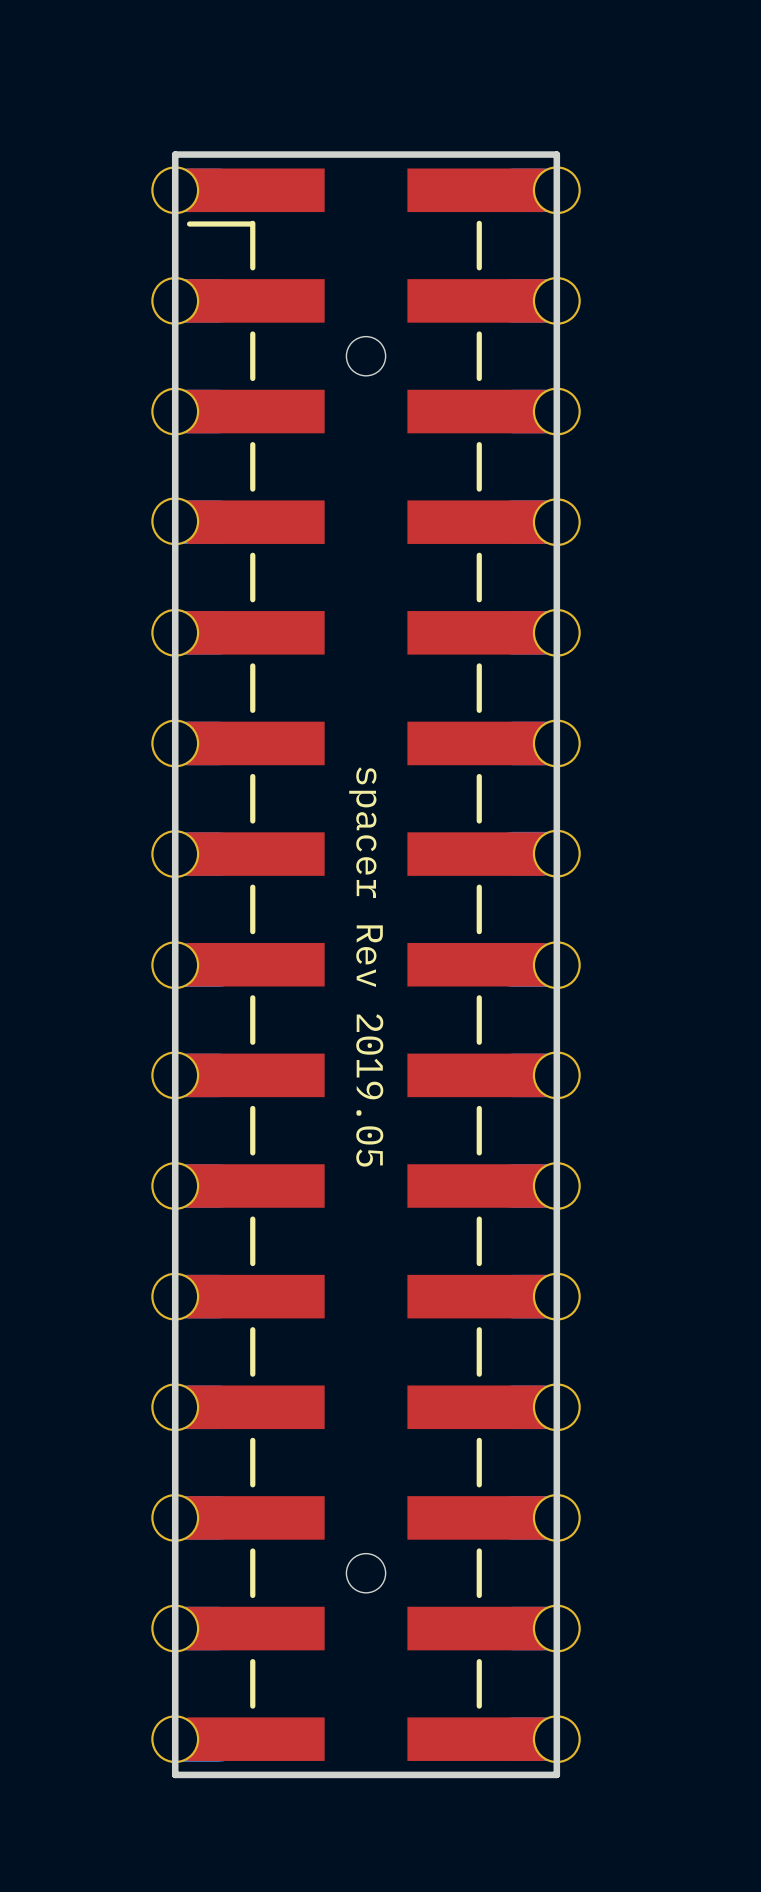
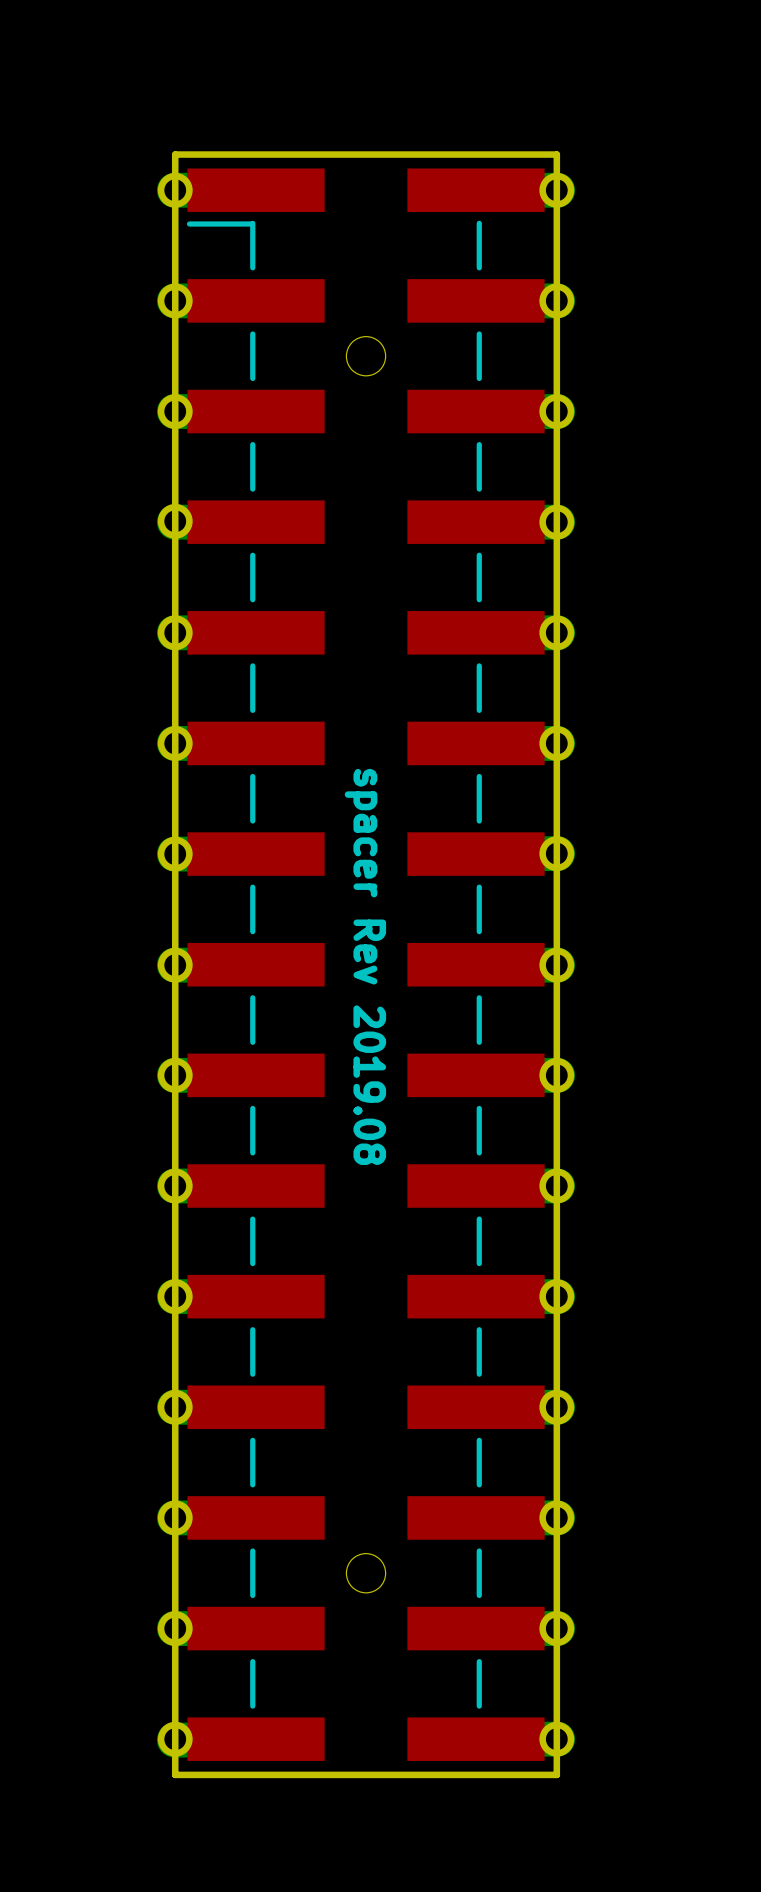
part footprint: [151, 151, 581, 1779] -> [156, 151, 576, 1779]
text: spacer Rev 2019.05 (366, 966) -> spacer Rev 2019.08 (365, 966)

